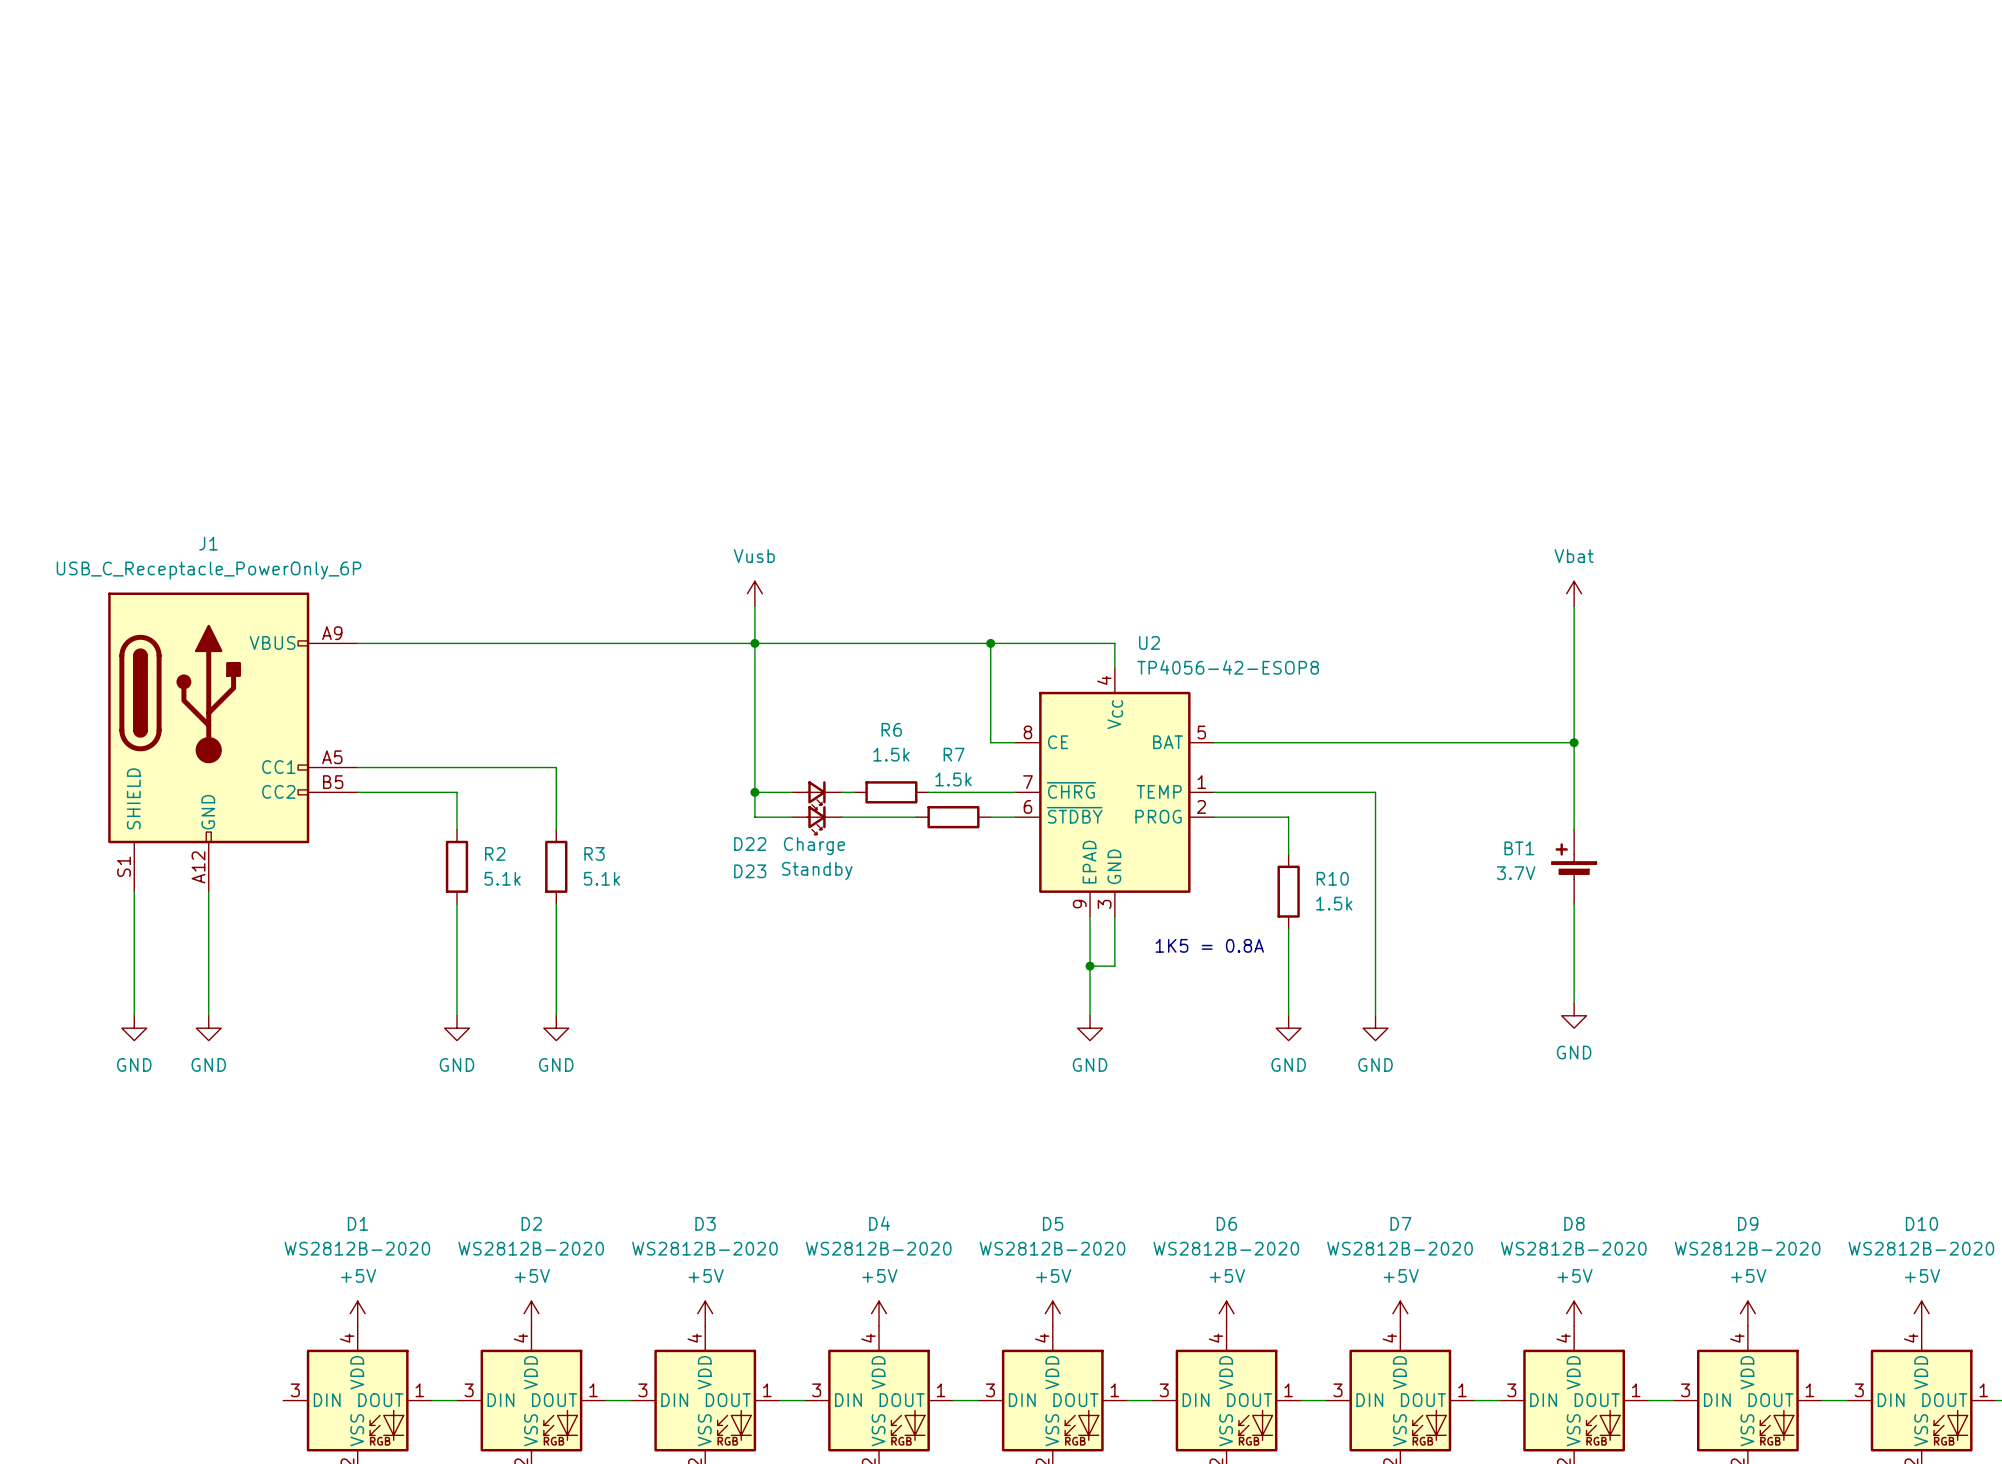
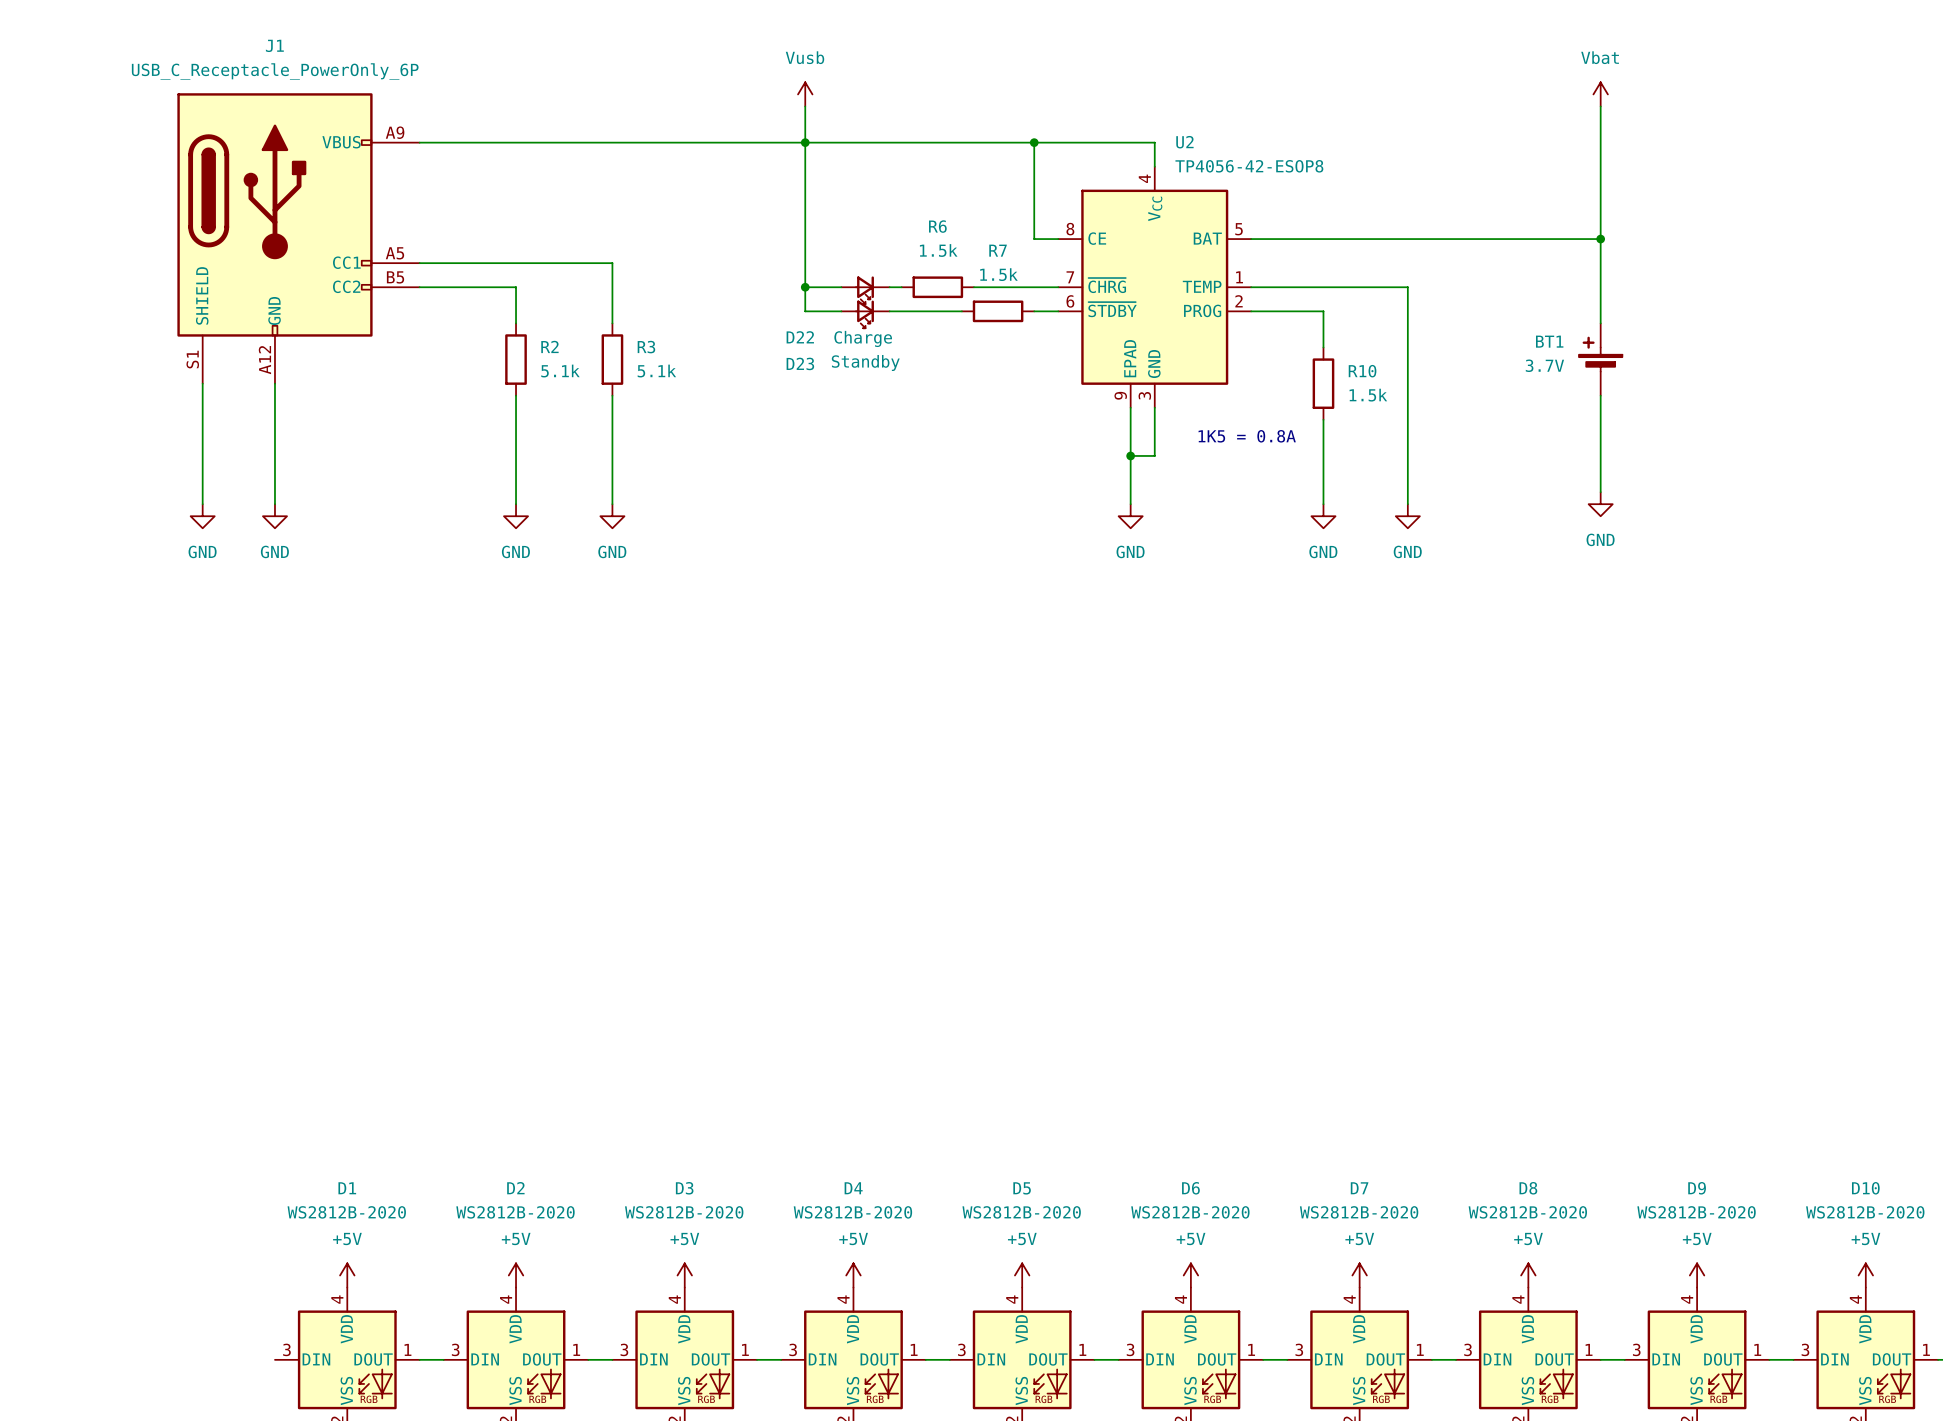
power symbol: none -> Vusb (805, 94)
power symbol: none -> Vbat (1600, 94)
wire: none -> (805, 106) (805, 311) (841, 311)
wire: none -> (1600, 106) (1600, 323)
wire: none -> (419, 142) (1154, 142) (1154, 166)
junction: none -> (805, 142)
wire: none -> (1034, 142) (1034, 239) (1058, 239)
junction: none -> (1034, 142)
wire: none -> (1251, 239) (1600, 239)
junction: none -> (1600, 239)
wire: none -> (419, 263) (612, 263) (612, 323)
wire: none -> (419, 287) (516, 287) (516, 323)
wire: none -> (805, 287) (841, 287)
junction: none -> (805, 287)
wire: none -> (889, 287) (901, 287)
wire: none -> (973, 287) (1058, 287)
wire: none -> (1251, 287) (1407, 287) (1407, 504)
wire: none -> (889, 311) (961, 311)
wire: none -> (1034, 311) (1058, 311)
wire: none -> (1251, 311) (1323, 311) (1323, 347)
wire: none -> (202, 383) (202, 504)
wire: none -> (274, 383) (274, 504)
wire: none -> (516, 395) (516, 504)
wire: none -> (612, 395) (612, 504)
wire: none -> (1600, 395) (1600, 492)
wire: none -> (1130, 407) (1130, 504)
wire: none -> (1154, 407) (1154, 455) (1130, 455)
wire: none -> (1323, 419) (1323, 504)
text: none -> 1K5 = 0.8A (1247, 436)
junction: none -> (1130, 455)
power symbol: none -> GND (1600, 504)
power symbol: none -> GND (202, 516)
power symbol: none -> GND (274, 516)
power symbol: none -> GND (516, 516)
power symbol: none -> GND (612, 516)
power symbol: none -> GND (1130, 516)
power symbol: none -> GND (1323, 516)
power symbol: none -> GND (1407, 516)
power symbol: Vusb (754, 593) -> none
power symbol: Vbat (1574, 593) -> none
wire: (754, 606) (754, 817) (792, 817) -> none
wire: (1574, 606) (1574, 829) -> none
wire: (357, 643) (1114, 643) (1114, 668) -> none
junction: (754, 643) -> none
wire: (990, 643) (990, 742) (1015, 742) -> none
junction: (990, 643) -> none
J1 position: (232, 742) -> (298, 238)
wire: (1214, 742) (1574, 742) -> none
junction: (1574, 742) -> none
wire: (357, 767) (556, 767) (556, 829) -> none
wire: (357, 792) (456, 792) (456, 829) -> none
wire: (754, 792) (792, 792) -> none
junction: (754, 792) -> none
wire: (841, 792) (854, 792) -> none
R6 position: (891, 792) -> (937, 287)
wire: (928, 792) (1015, 792) -> none
U2 position: (1114, 792) -> (1154, 287)
wire: (1214, 792) (1375, 792) (1375, 1015) -> none
D22 position: (816, 795) -> (865, 290)
wire: (841, 817) (916, 817) -> none
R7 position: (953, 817) -> (998, 311)
wire: (990, 817) (1015, 817) -> none
wire: (1214, 817) (1288, 817) (1288, 854) -> none
D23 position: (816, 820) -> (865, 314)
R2 position: (456, 866) -> (516, 359)
R3 position: (556, 866) -> (612, 359)
BT1 position: (1574, 866) -> (1600, 359)
wire: (134, 891) (134, 1015) -> none
wire: (208, 891) (208, 1015) -> none
R10 position: (1288, 891) -> (1323, 383)
wire: (456, 904) (456, 1015) -> none
wire: (556, 904) (556, 1015) -> none
wire: (1574, 904) (1574, 1003) -> none
wire: (1090, 916) (1090, 1015) -> none
wire: (1114, 916) (1114, 966) (1090, 966) -> none
wire: (1288, 928) (1288, 1015) -> none
text: 1K5 = 0.8A (1209, 945) -> none
junction: (1090, 966) -> none
power symbol: GND (1574, 1015) -> none
power symbol: GND (134, 1028) -> none
power symbol: GND (208, 1028) -> none
power symbol: GND (456, 1028) -> none
power symbol: GND (556, 1028) -> none
power symbol: GND (1090, 1028) -> none
power symbol: GND (1288, 1028) -> none
power symbol: GND (1375, 1028) -> none

